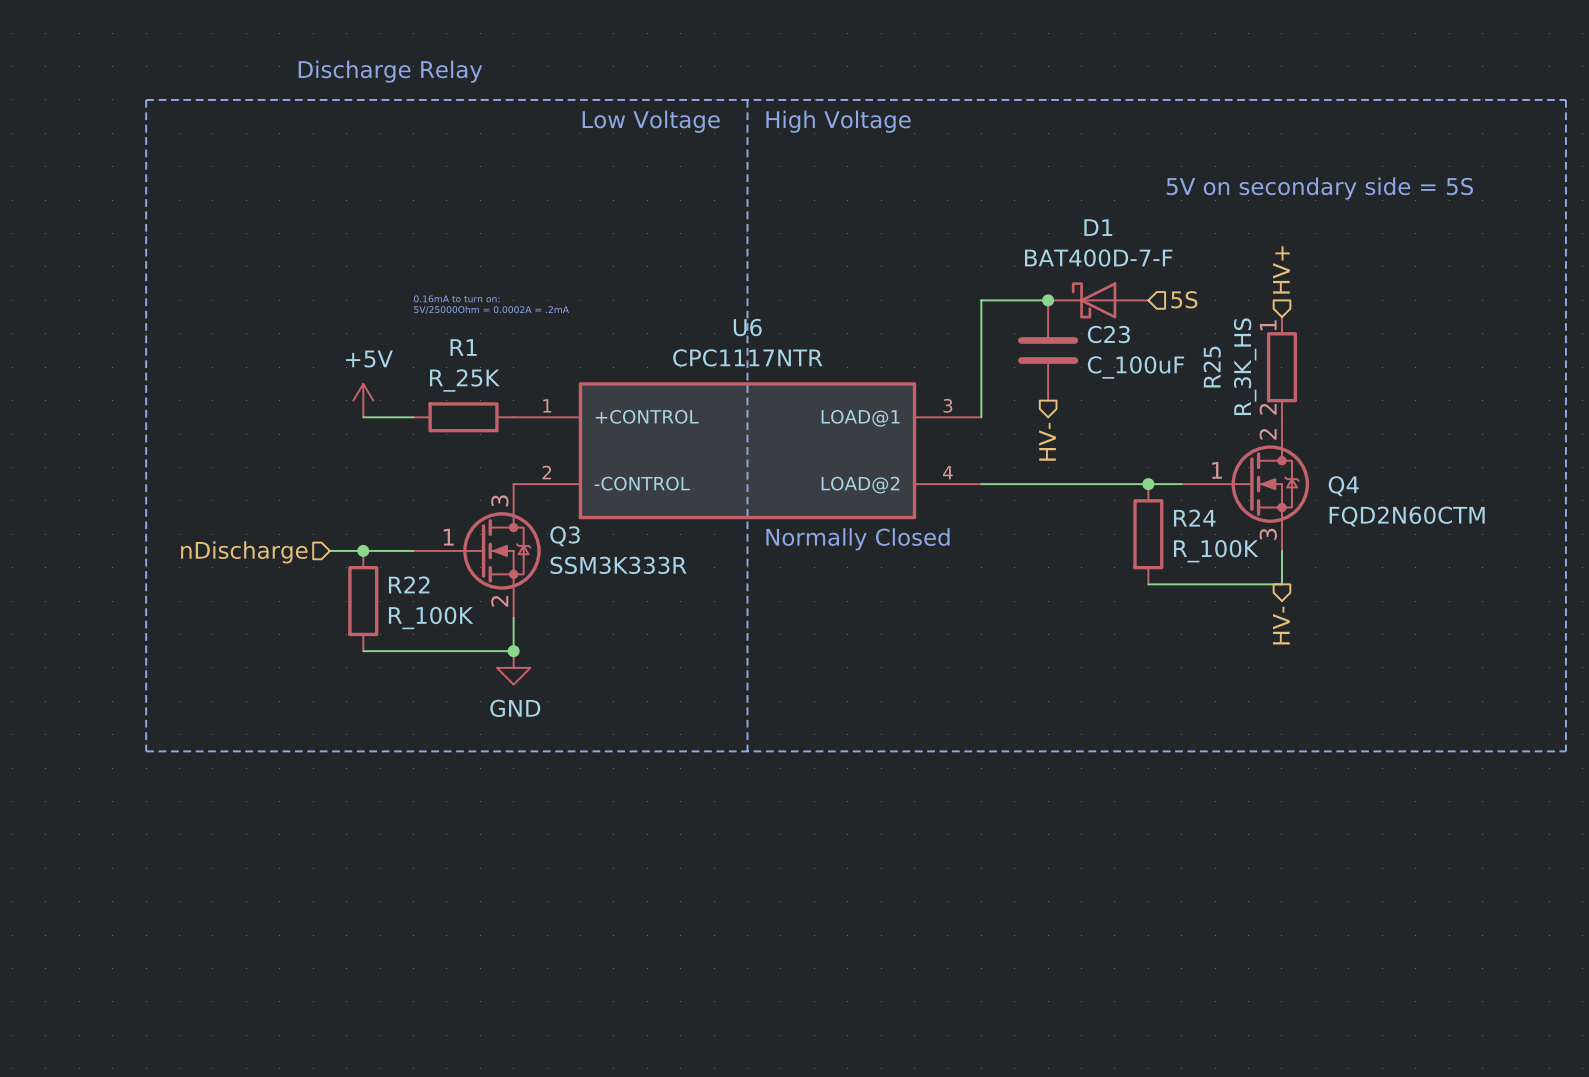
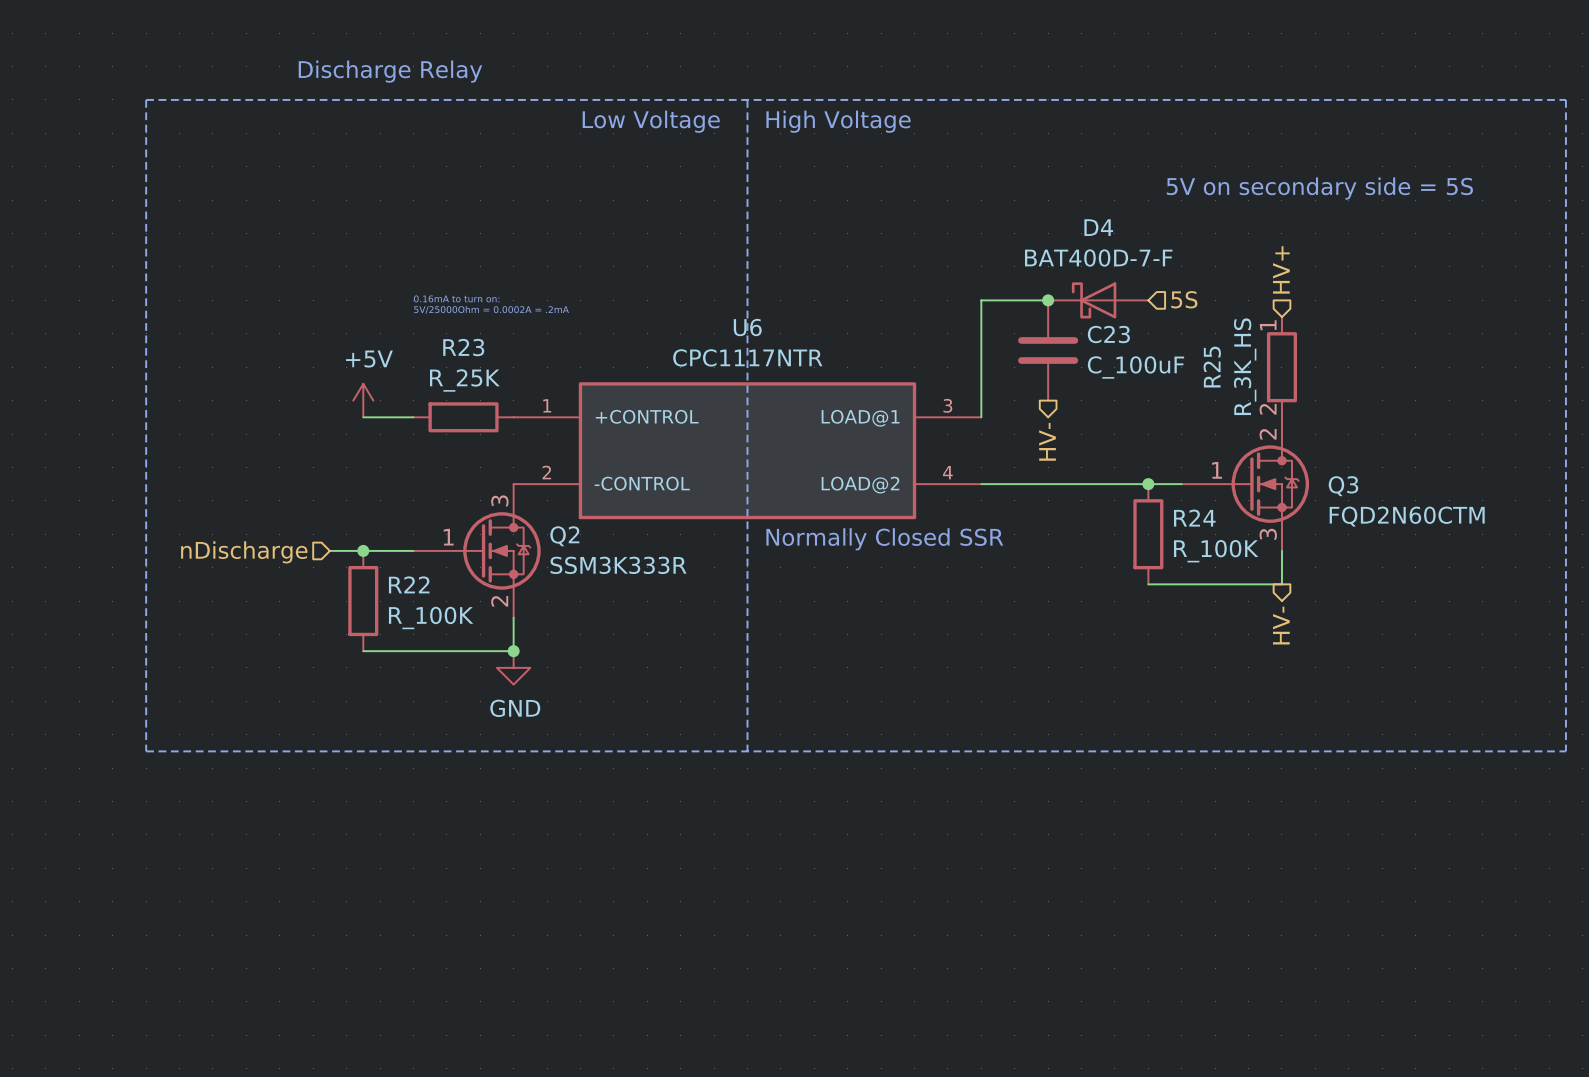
D1 name: D1 (1098, 227) -> D4 (1098, 227)
R1 name: R1 (463, 347) -> R23 (463, 347)
Q4 name: Q4 (1343, 486) -> Q3 (1343, 486)
Q3 name: Q3 (565, 536) -> Q2 (564, 536)
text: Normally Closed (858, 539) -> Normally Closed SSR (884, 539)

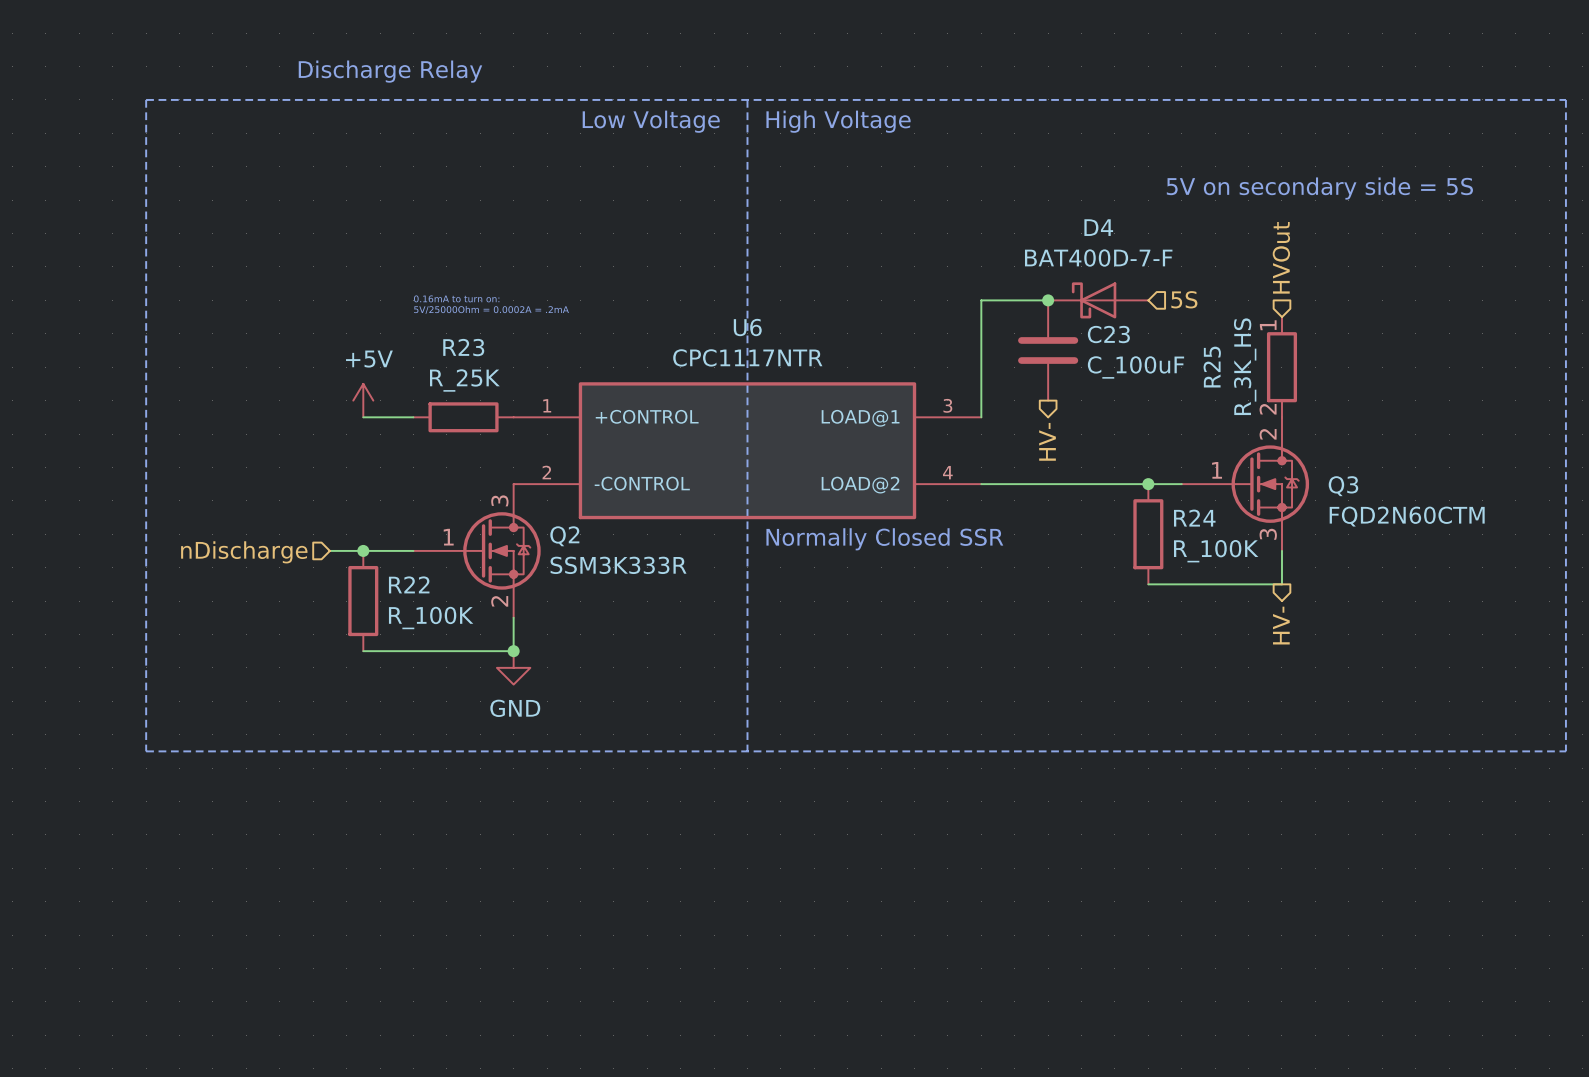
hierarchical label: HV+ (1281, 269) -> HVOut (1281, 257)

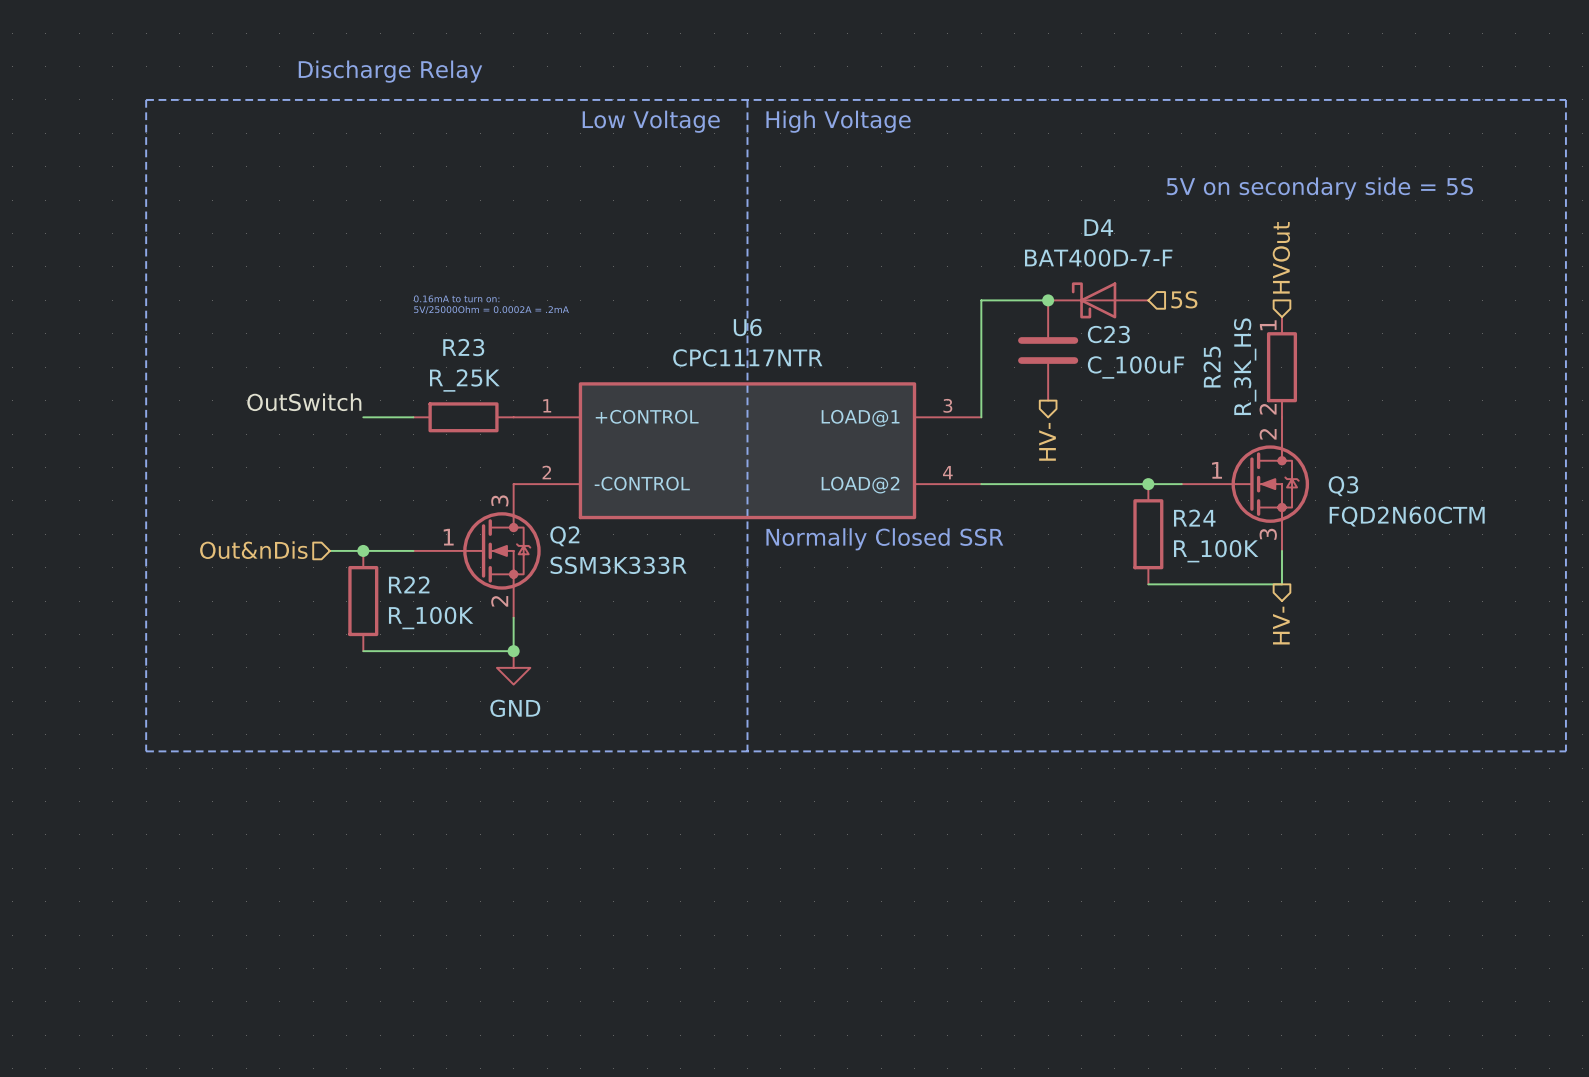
power symbol: +5V (363, 400) -> none
label: none -> OutSwitch (304, 402)
hierarchical label: nDischarge (244, 552) -> Out&nDis (253, 550)

